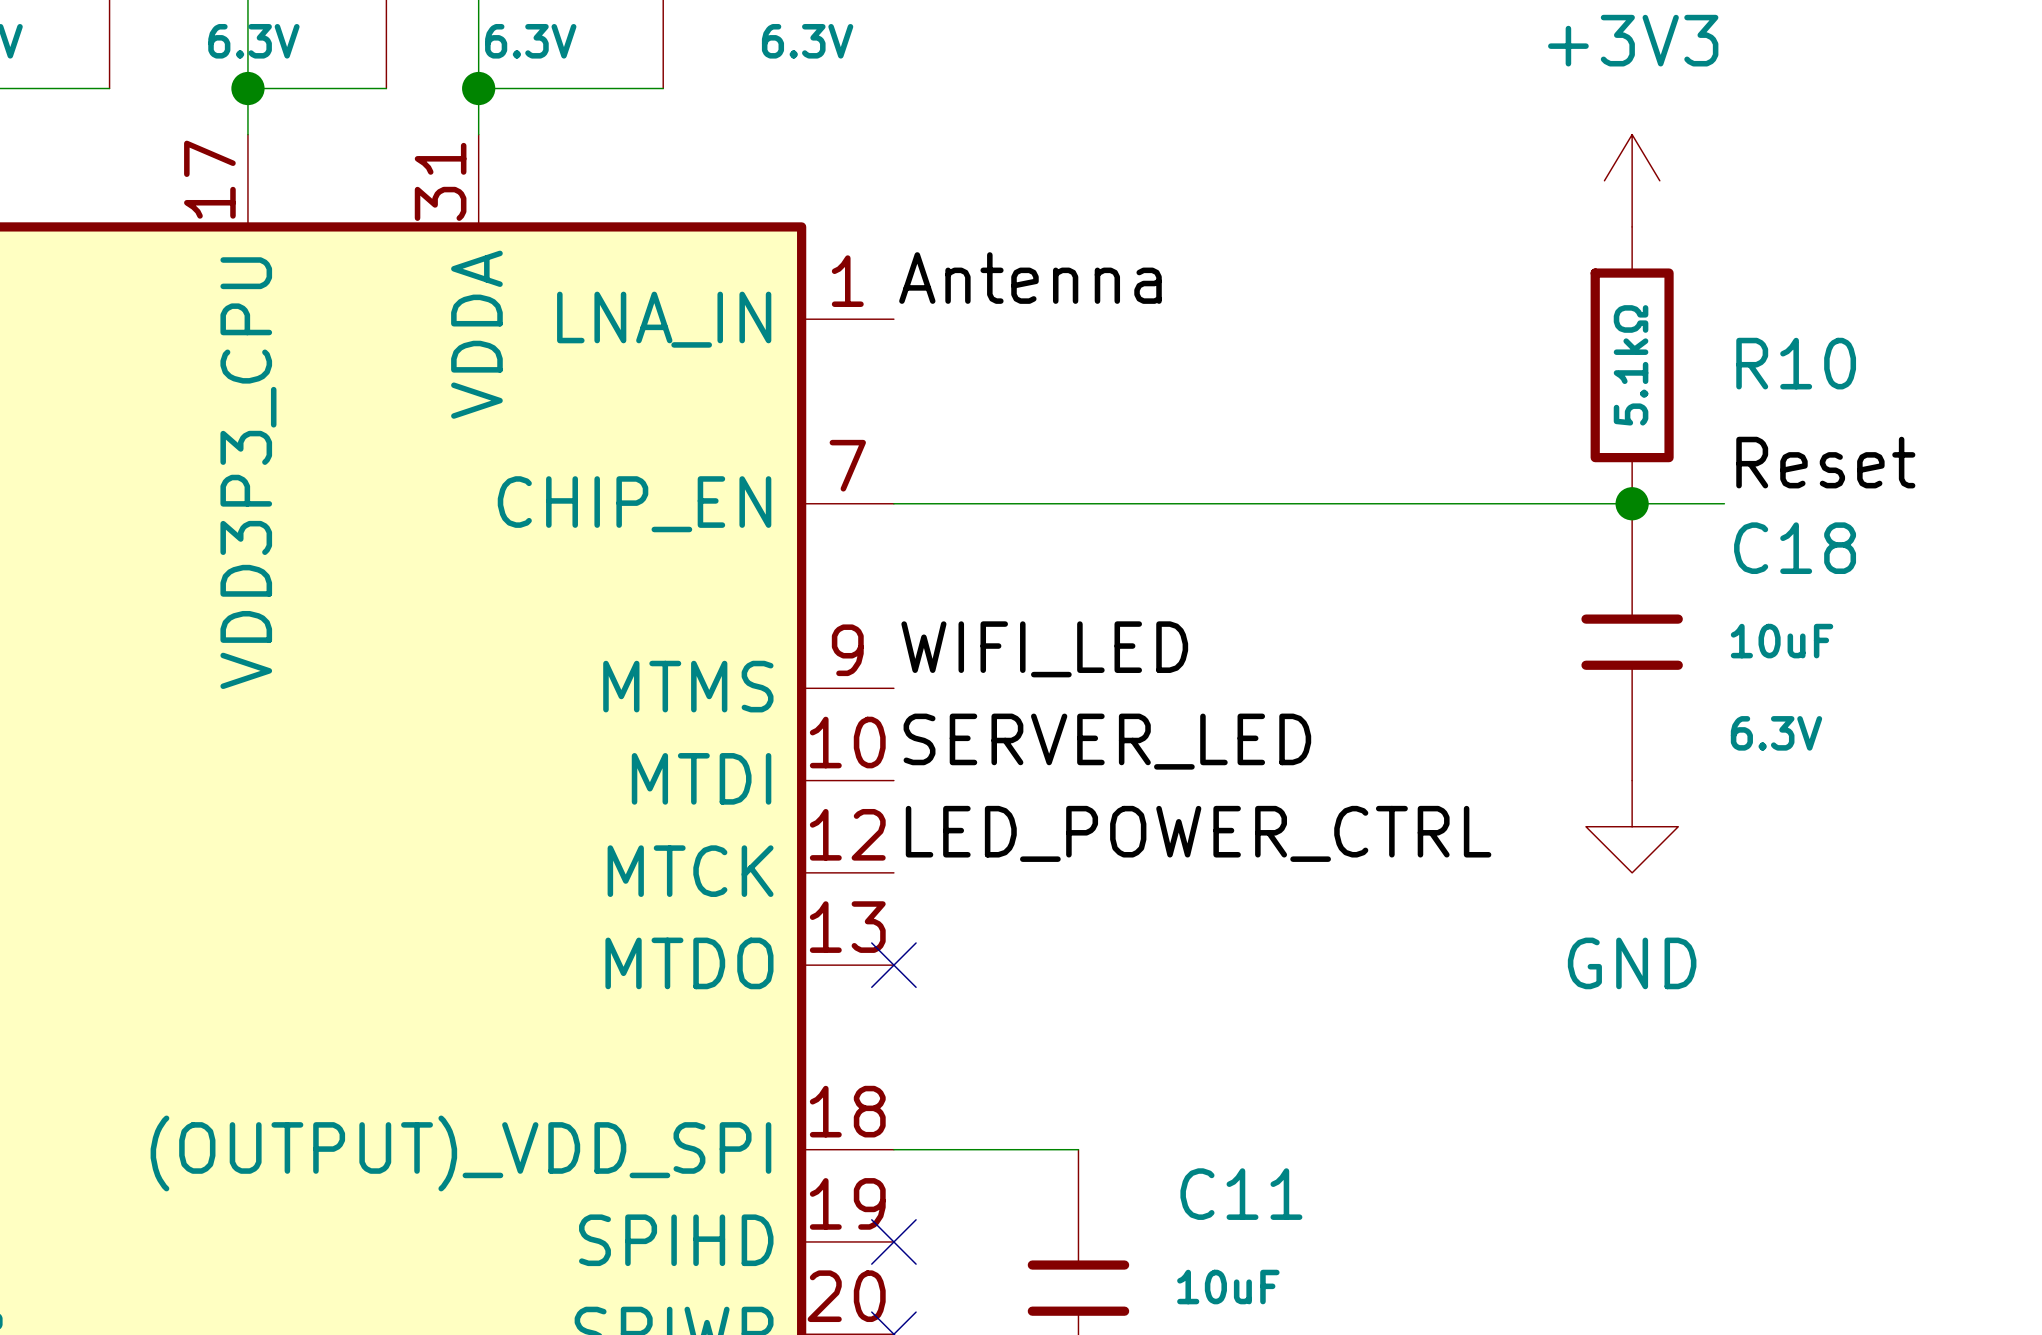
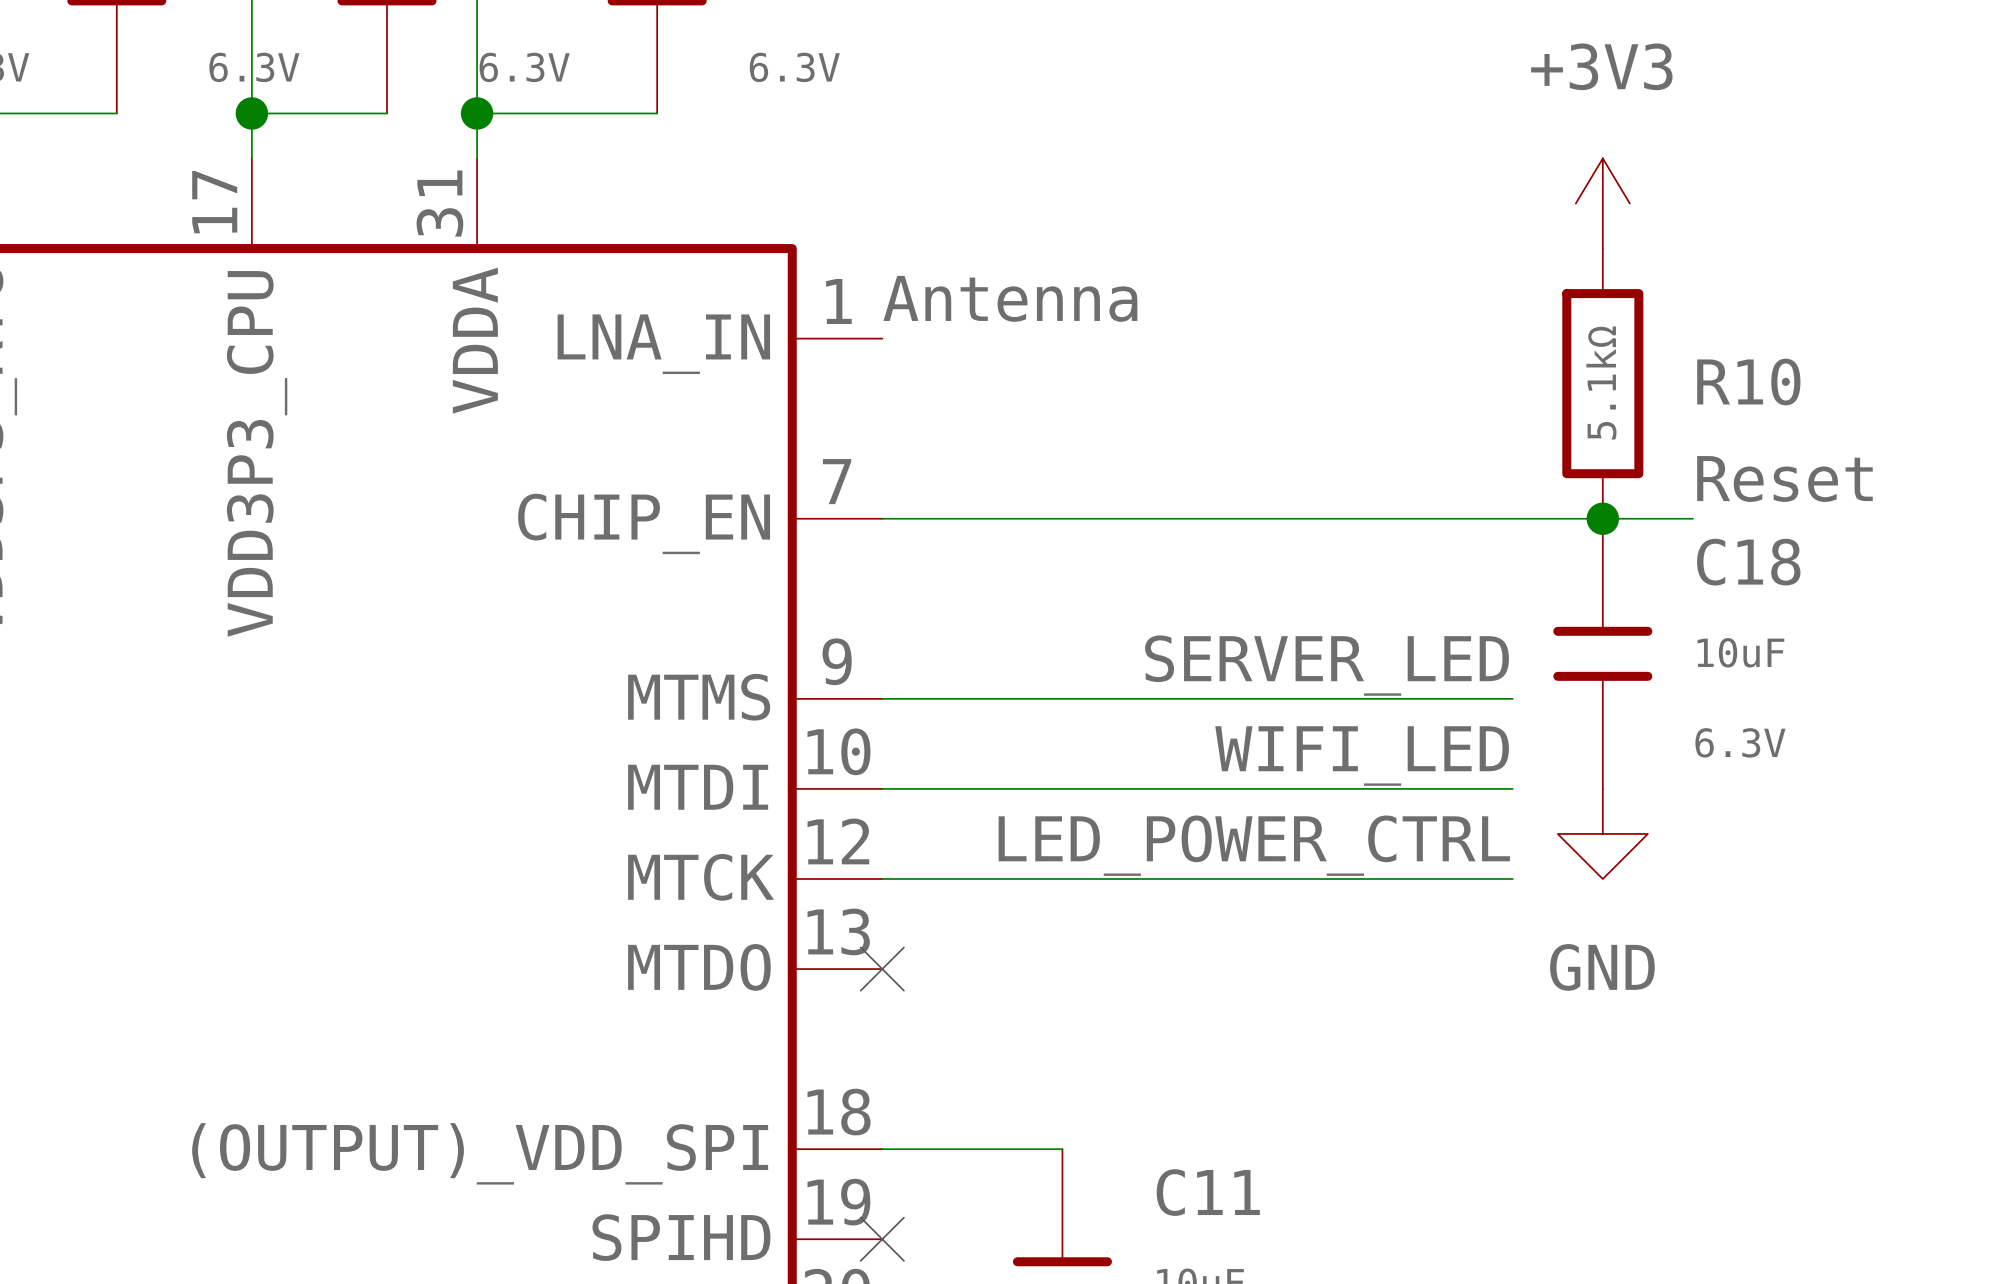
label position: WIFI_LED (1044, 649) -> WIFI_LED (1362, 756)
wire: none -> (882, 698) (1512, 698)
label position: SERVER_LED (1107, 741) -> SERVER_LED (1327, 665)
wire: none -> (882, 788) (1512, 788)
label position: LED_POWER_CTRL (1198, 833) -> LED_POWER_CTRL (1254, 845)
wire: none -> (882, 878) (1512, 878)

